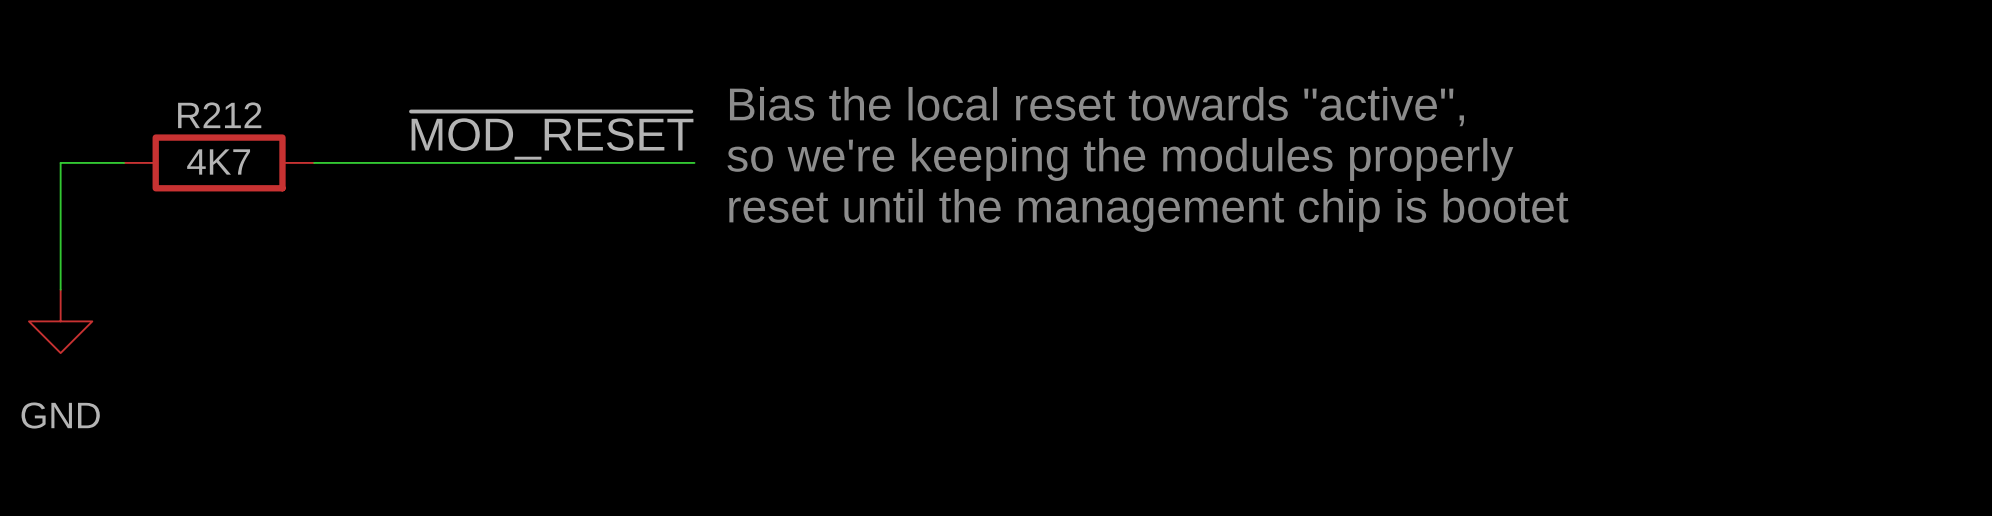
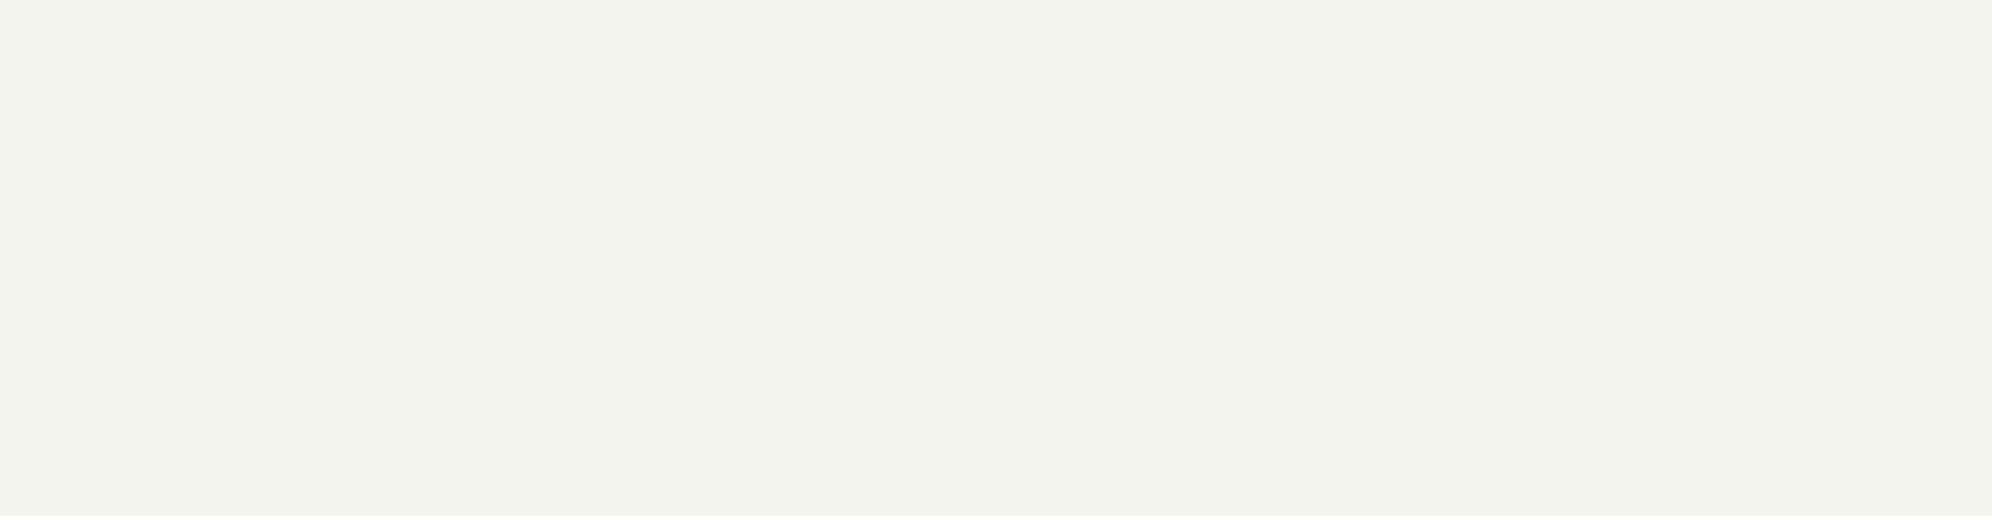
text: Bias the local reset towards "active", (1096, 106) -> none
label: ~{MOD_RESET} (552, 135) -> none
text: so we're keeping the modules properly (1120, 159) -> none
wire: (124, 162) (60, 162) (60, 289) -> none
R212: 4K7 (219, 162) -> none
wire: (314, 162) (694, 162) -> none
text: reset until the management chip is bootet (1148, 210) -> none
power symbol: GND (60, 321) -> none

